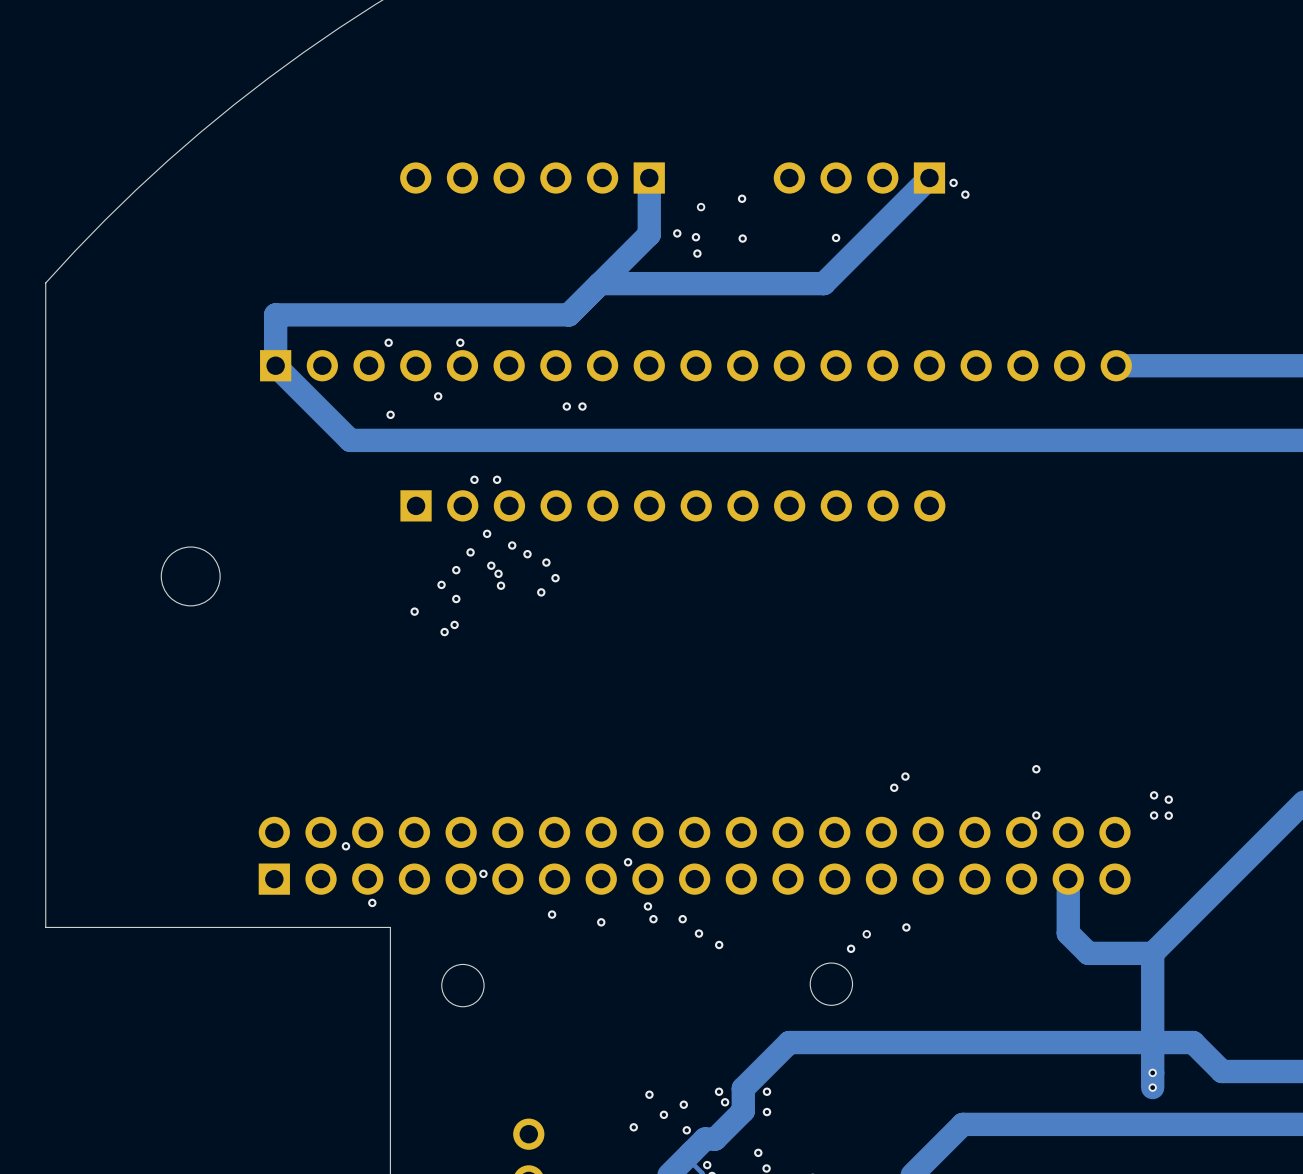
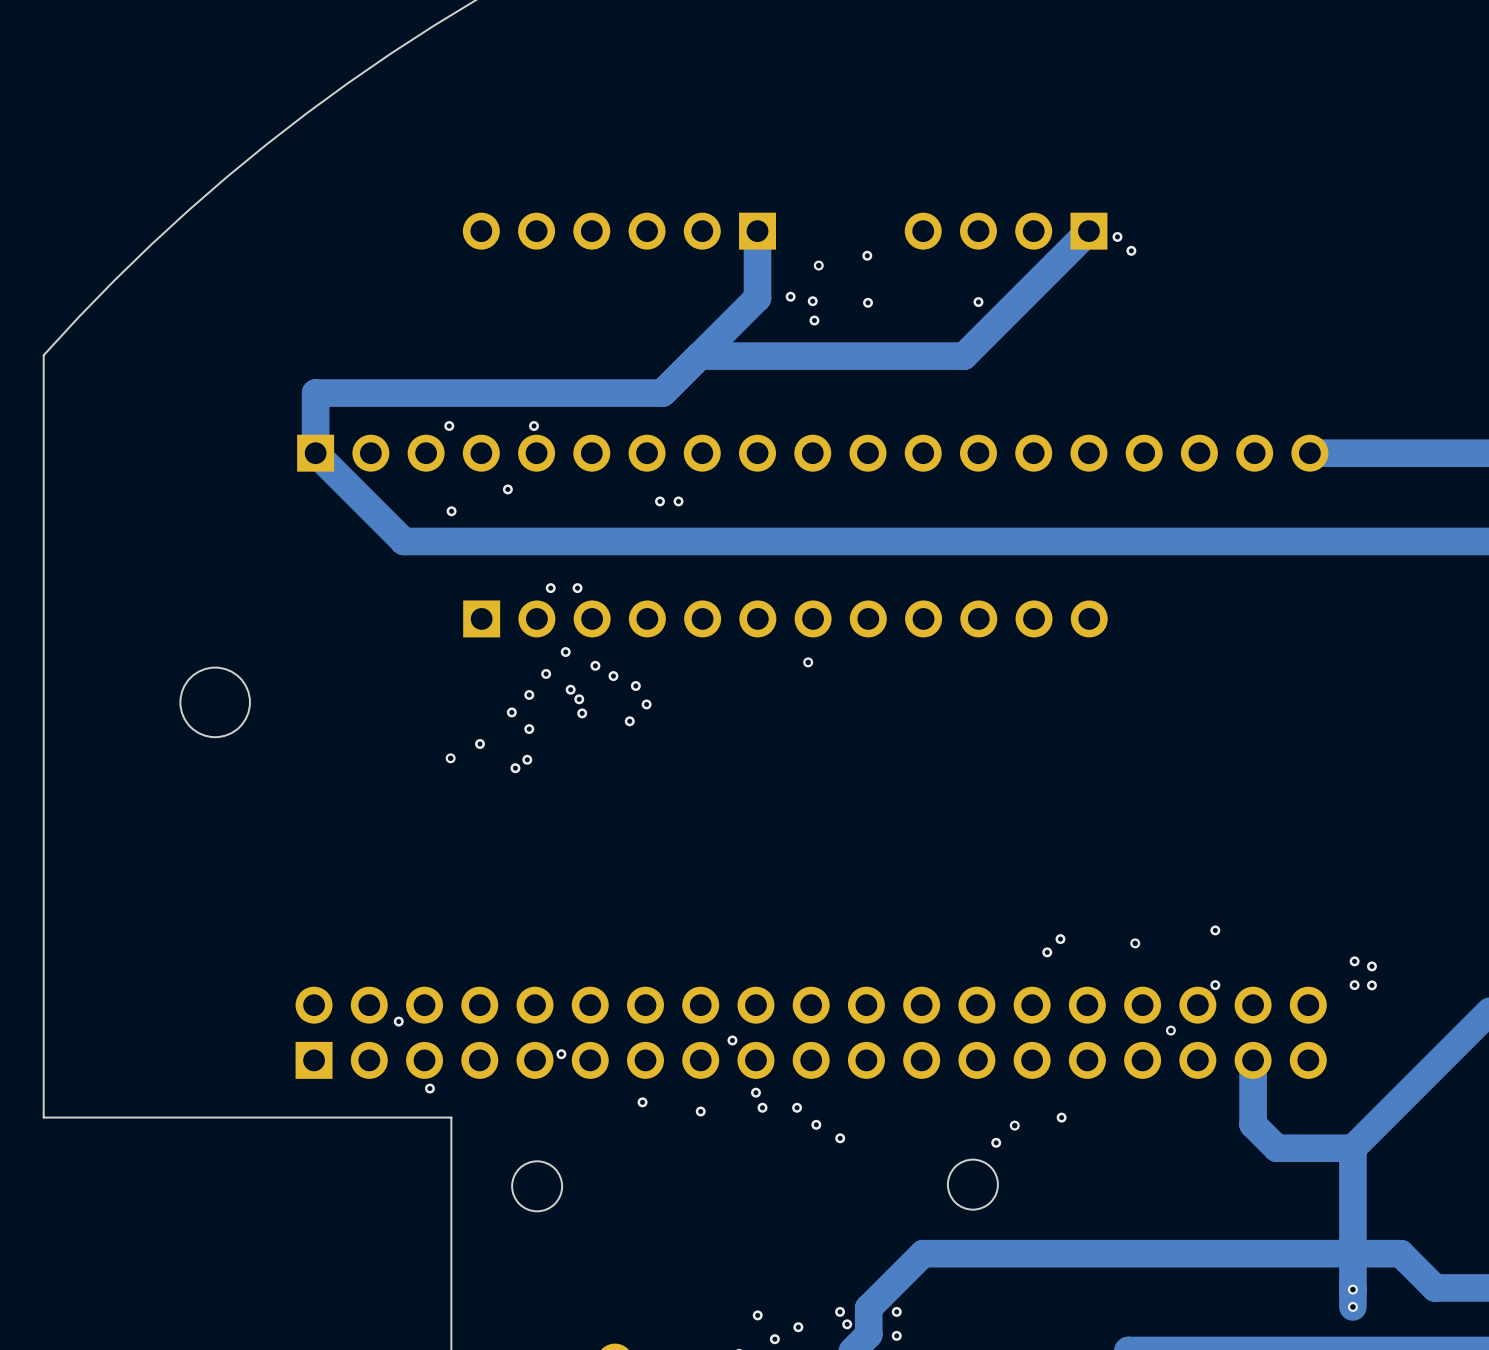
via: none -> (808, 662)
via: none -> (450, 758)
via: none -> (1135, 943)
via: none -> (1170, 1030)

